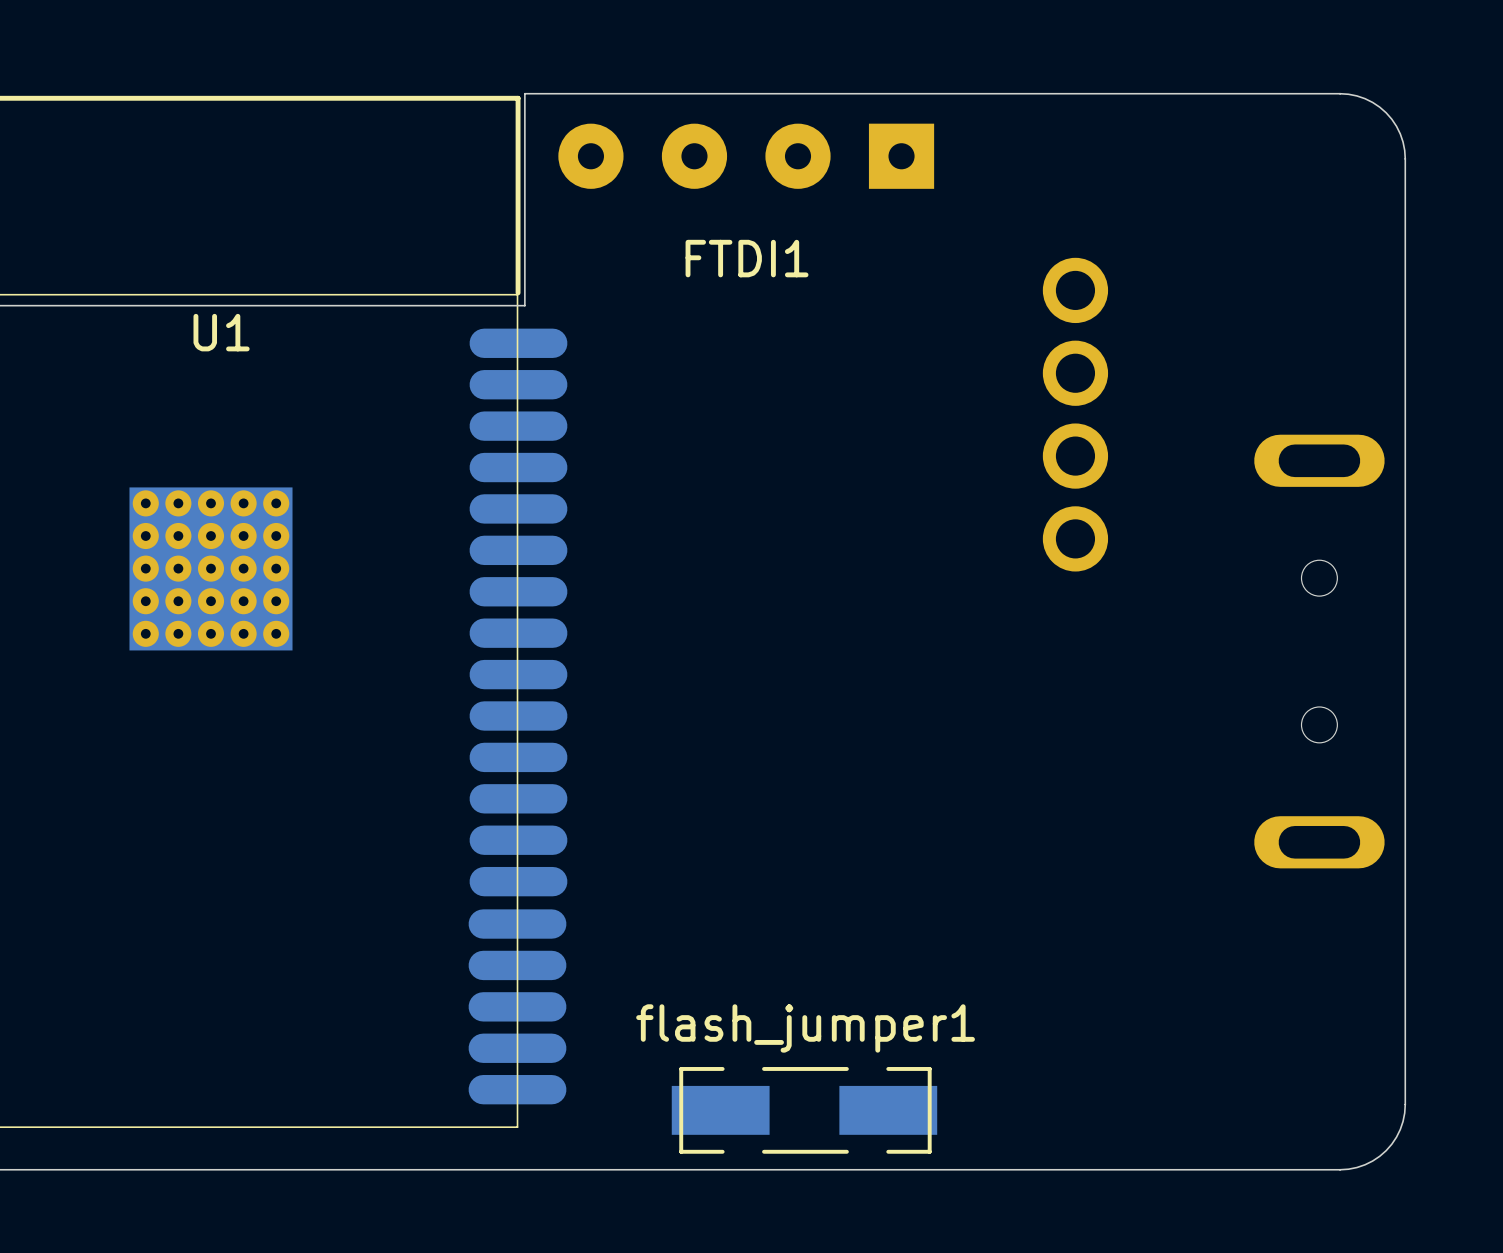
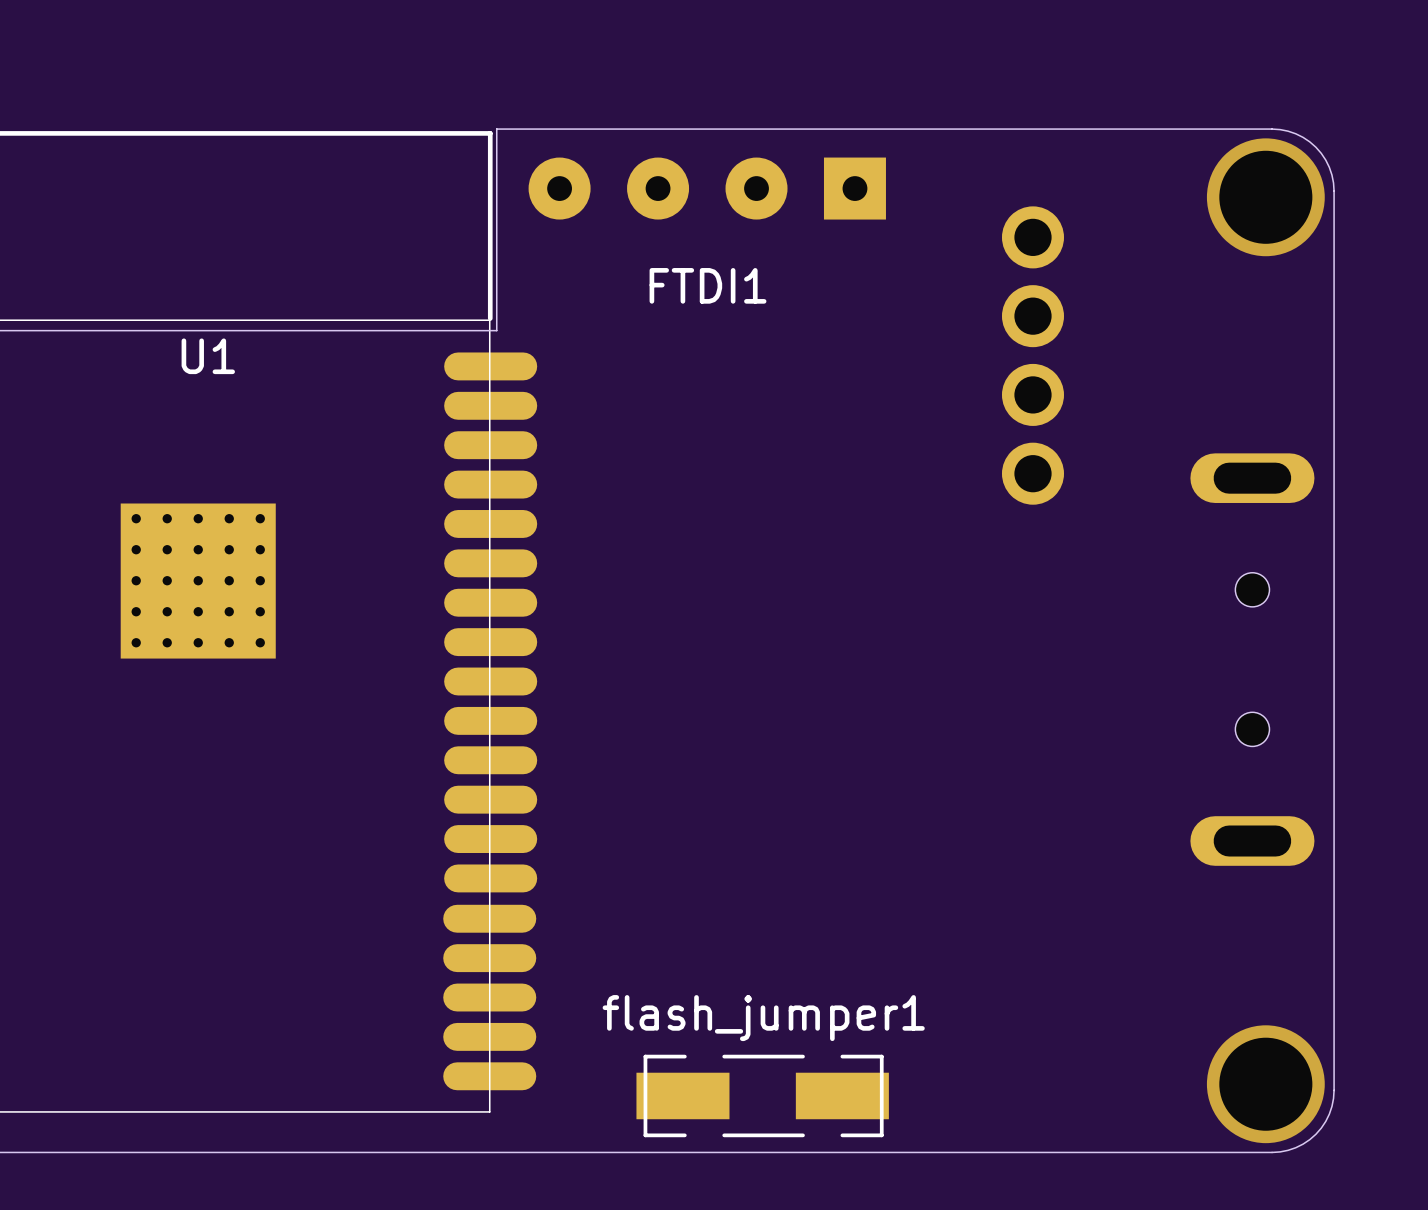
via: none -> (1265, 197)
part position: (1075, 414) -> (1032, 355)
via: none -> (1265, 1084)

